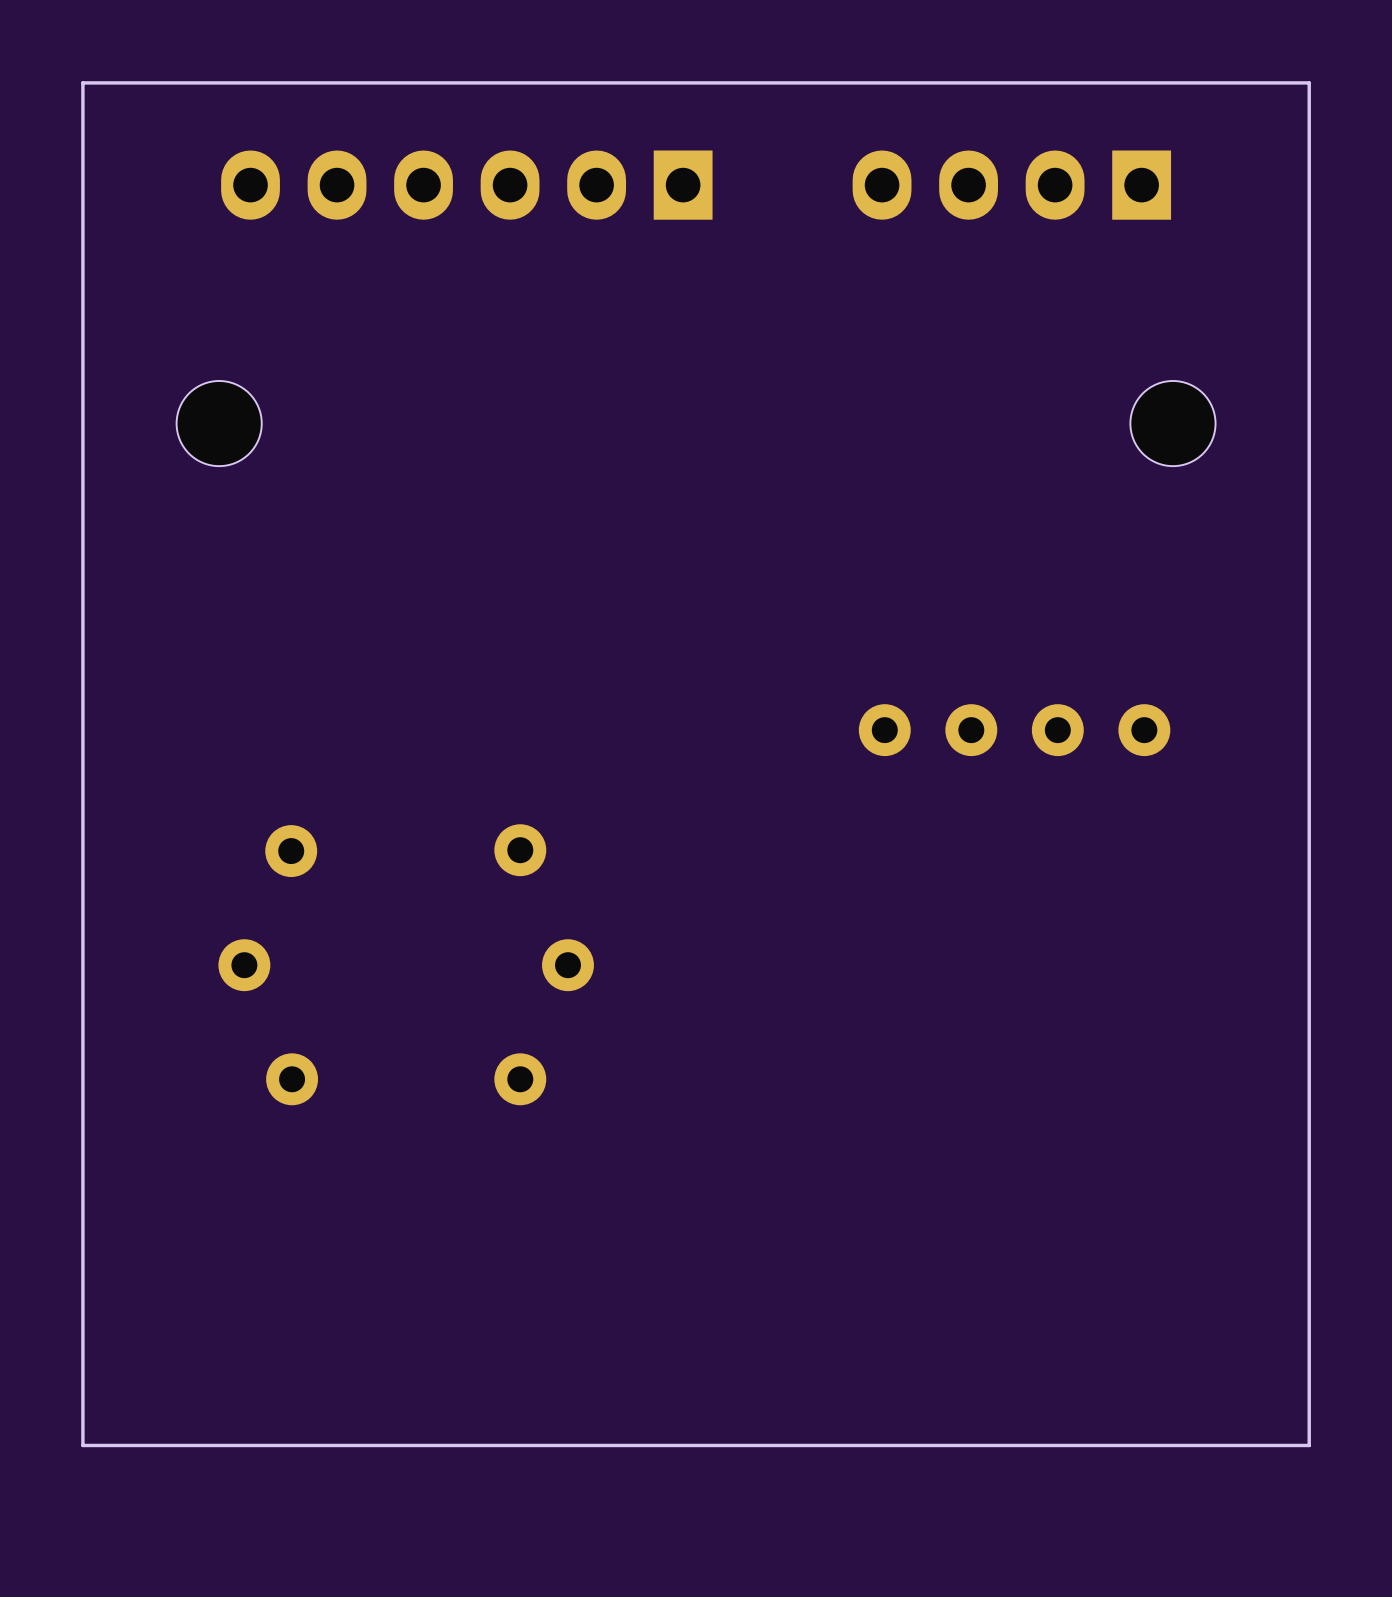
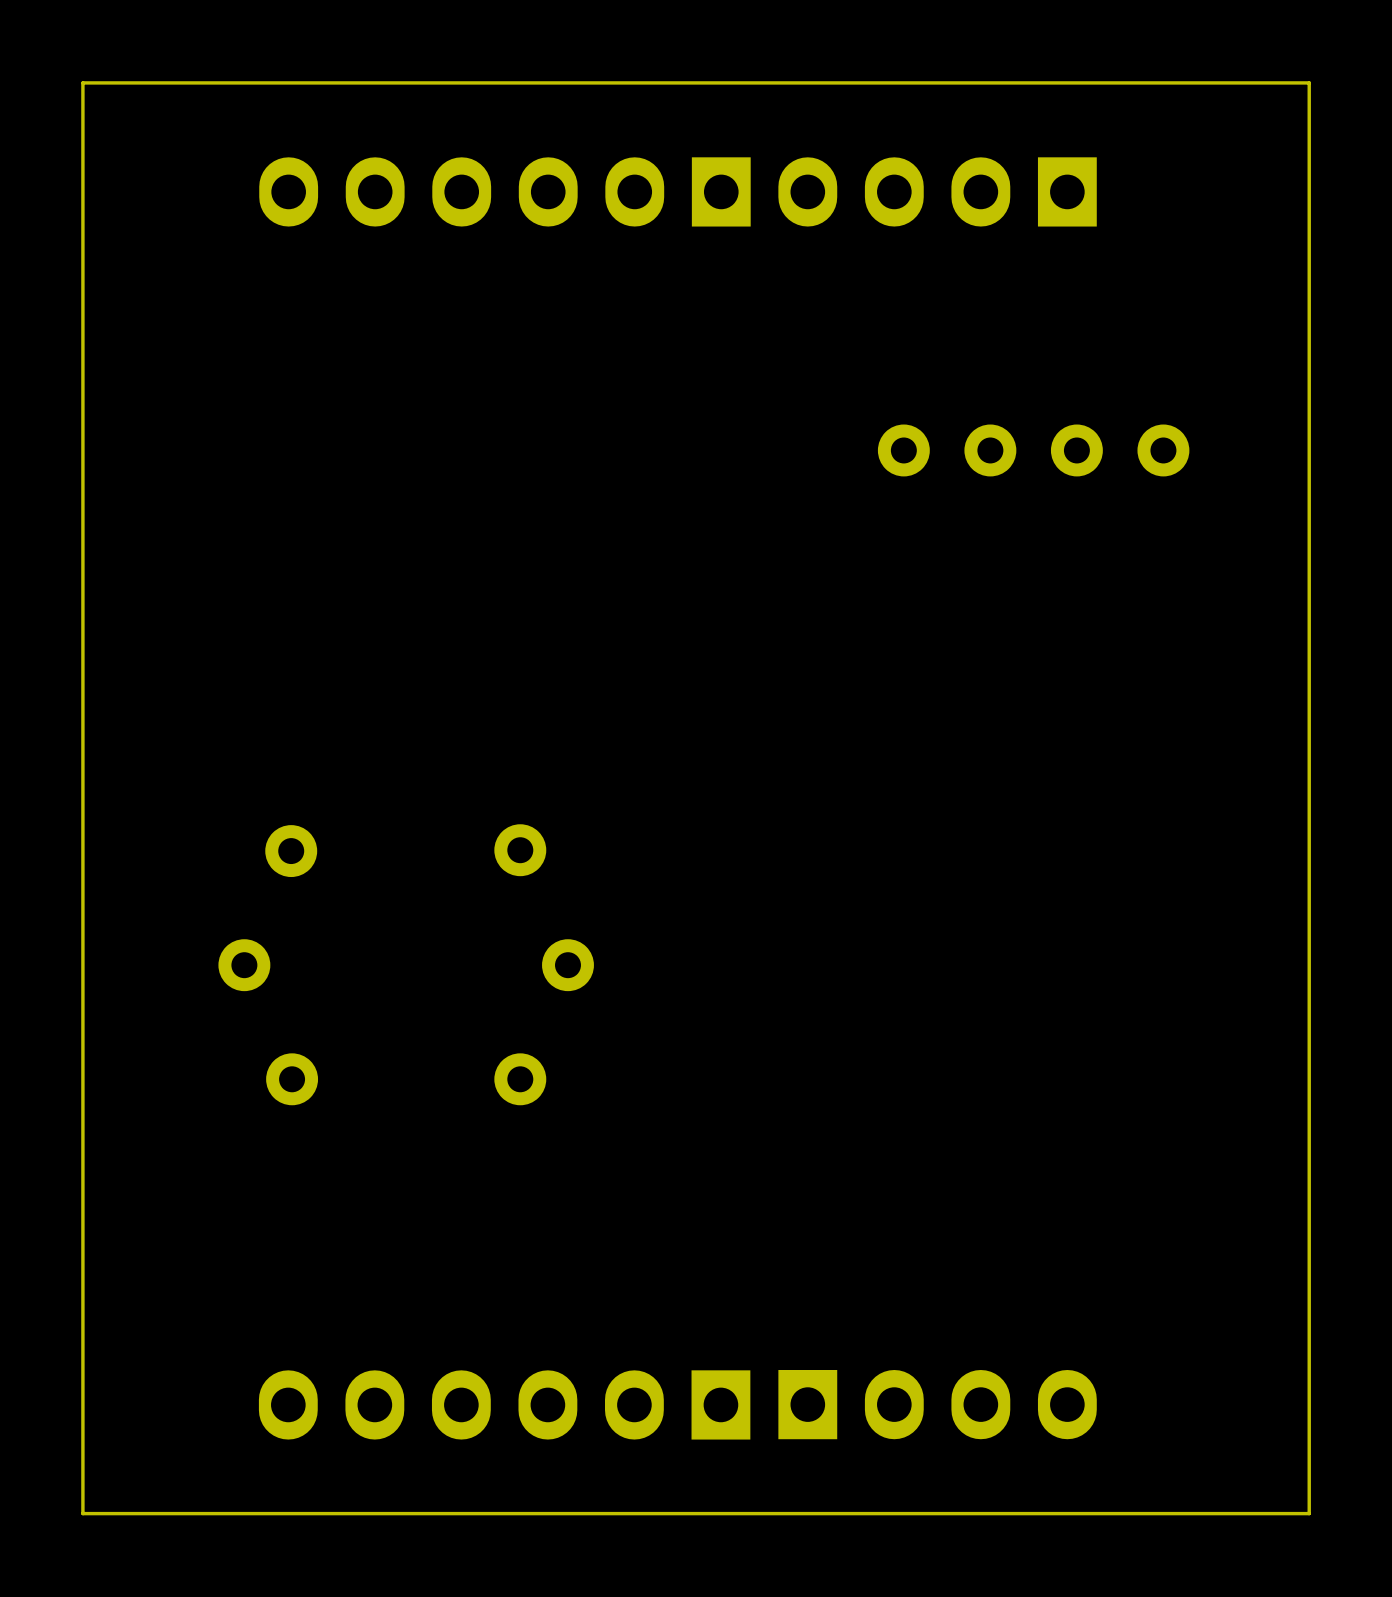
part position: (466, 185) -> (504, 191)
part position: (1011, 185) -> (937, 191)
part: (219, 423) -> none
part: (1172, 423) -> none
part position: (1014, 730) -> (1033, 450)
part: none -> (504, 1404)
part: none -> (937, 1404)
board edge: (1309, 1445) (82, 1445) -> (1309, 1445) (1309, 1513) (82, 1513) (82, 1445)

